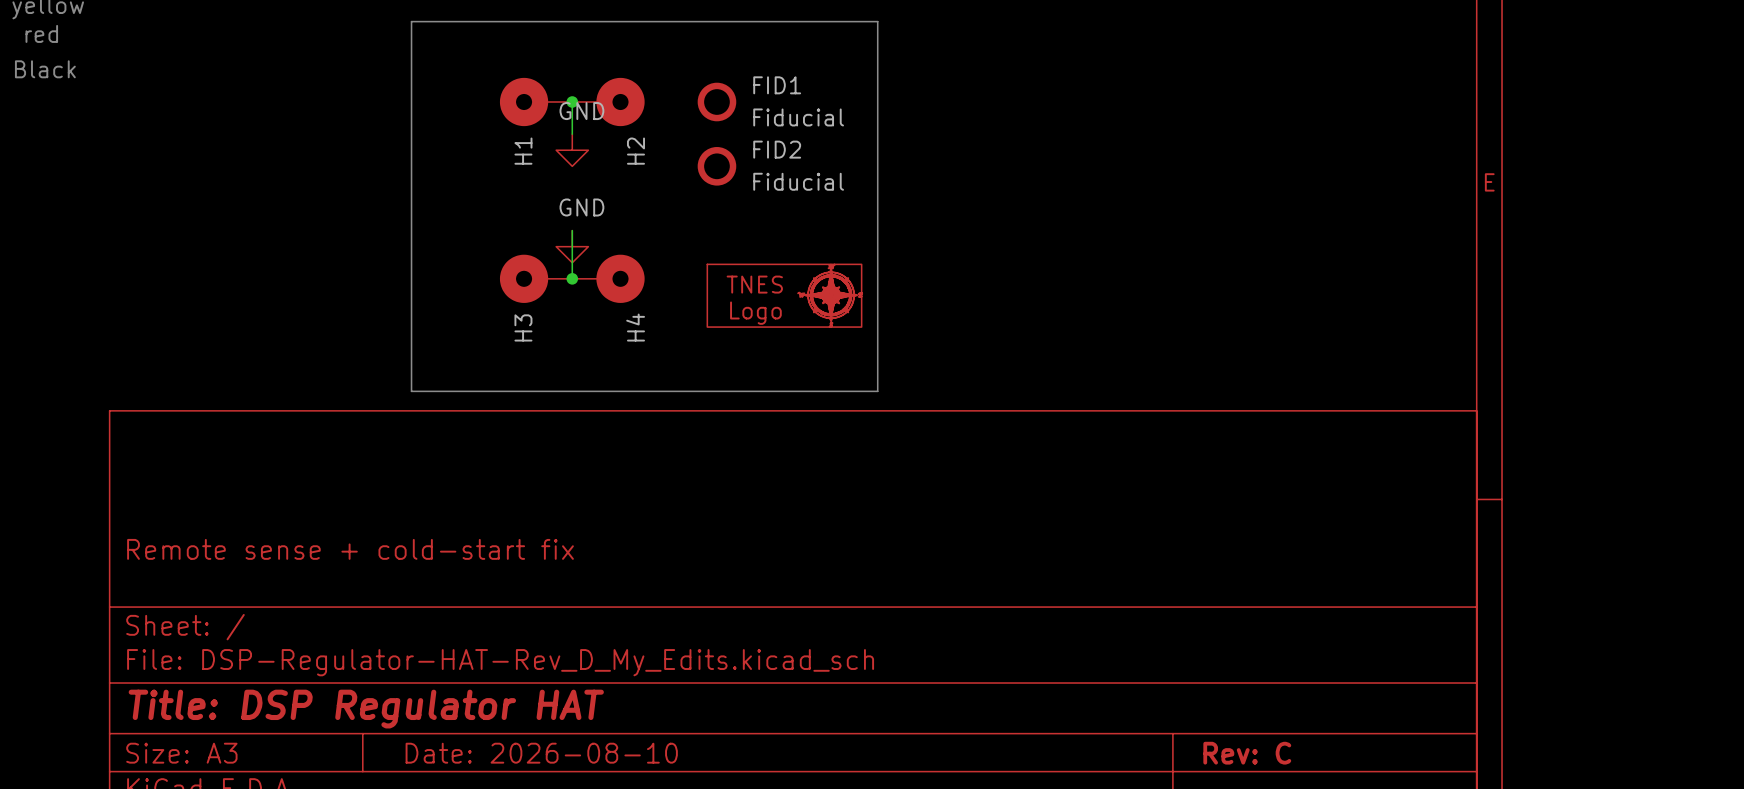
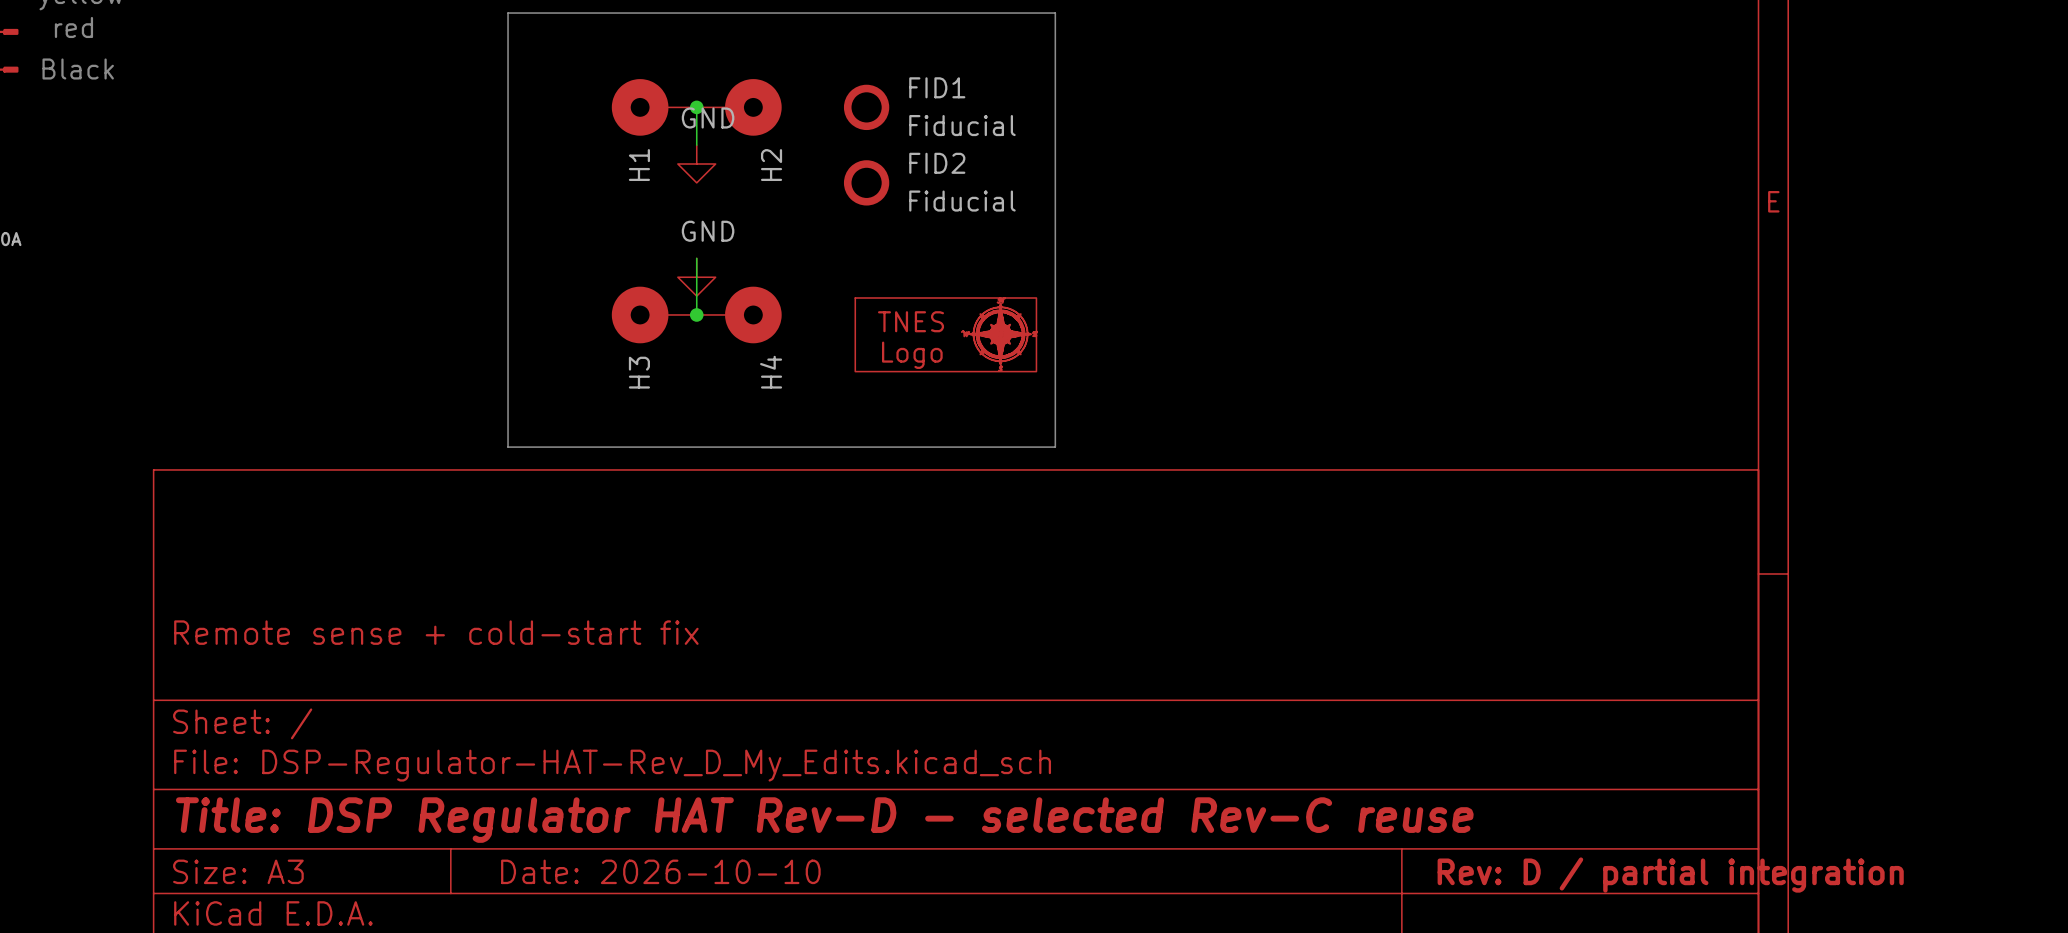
title block: Title: DSP Regulator HAT (366, 709) -> Title: DSP Regulator HAT Rev-D - selected Rev-C reuse (824, 820)
title block: Date: 2026-08-10 (541, 753) -> Date: 2026-10-10 (660, 871)
title block: Rev: C (1247, 753) -> Rev: D / partial integration (1670, 875)

